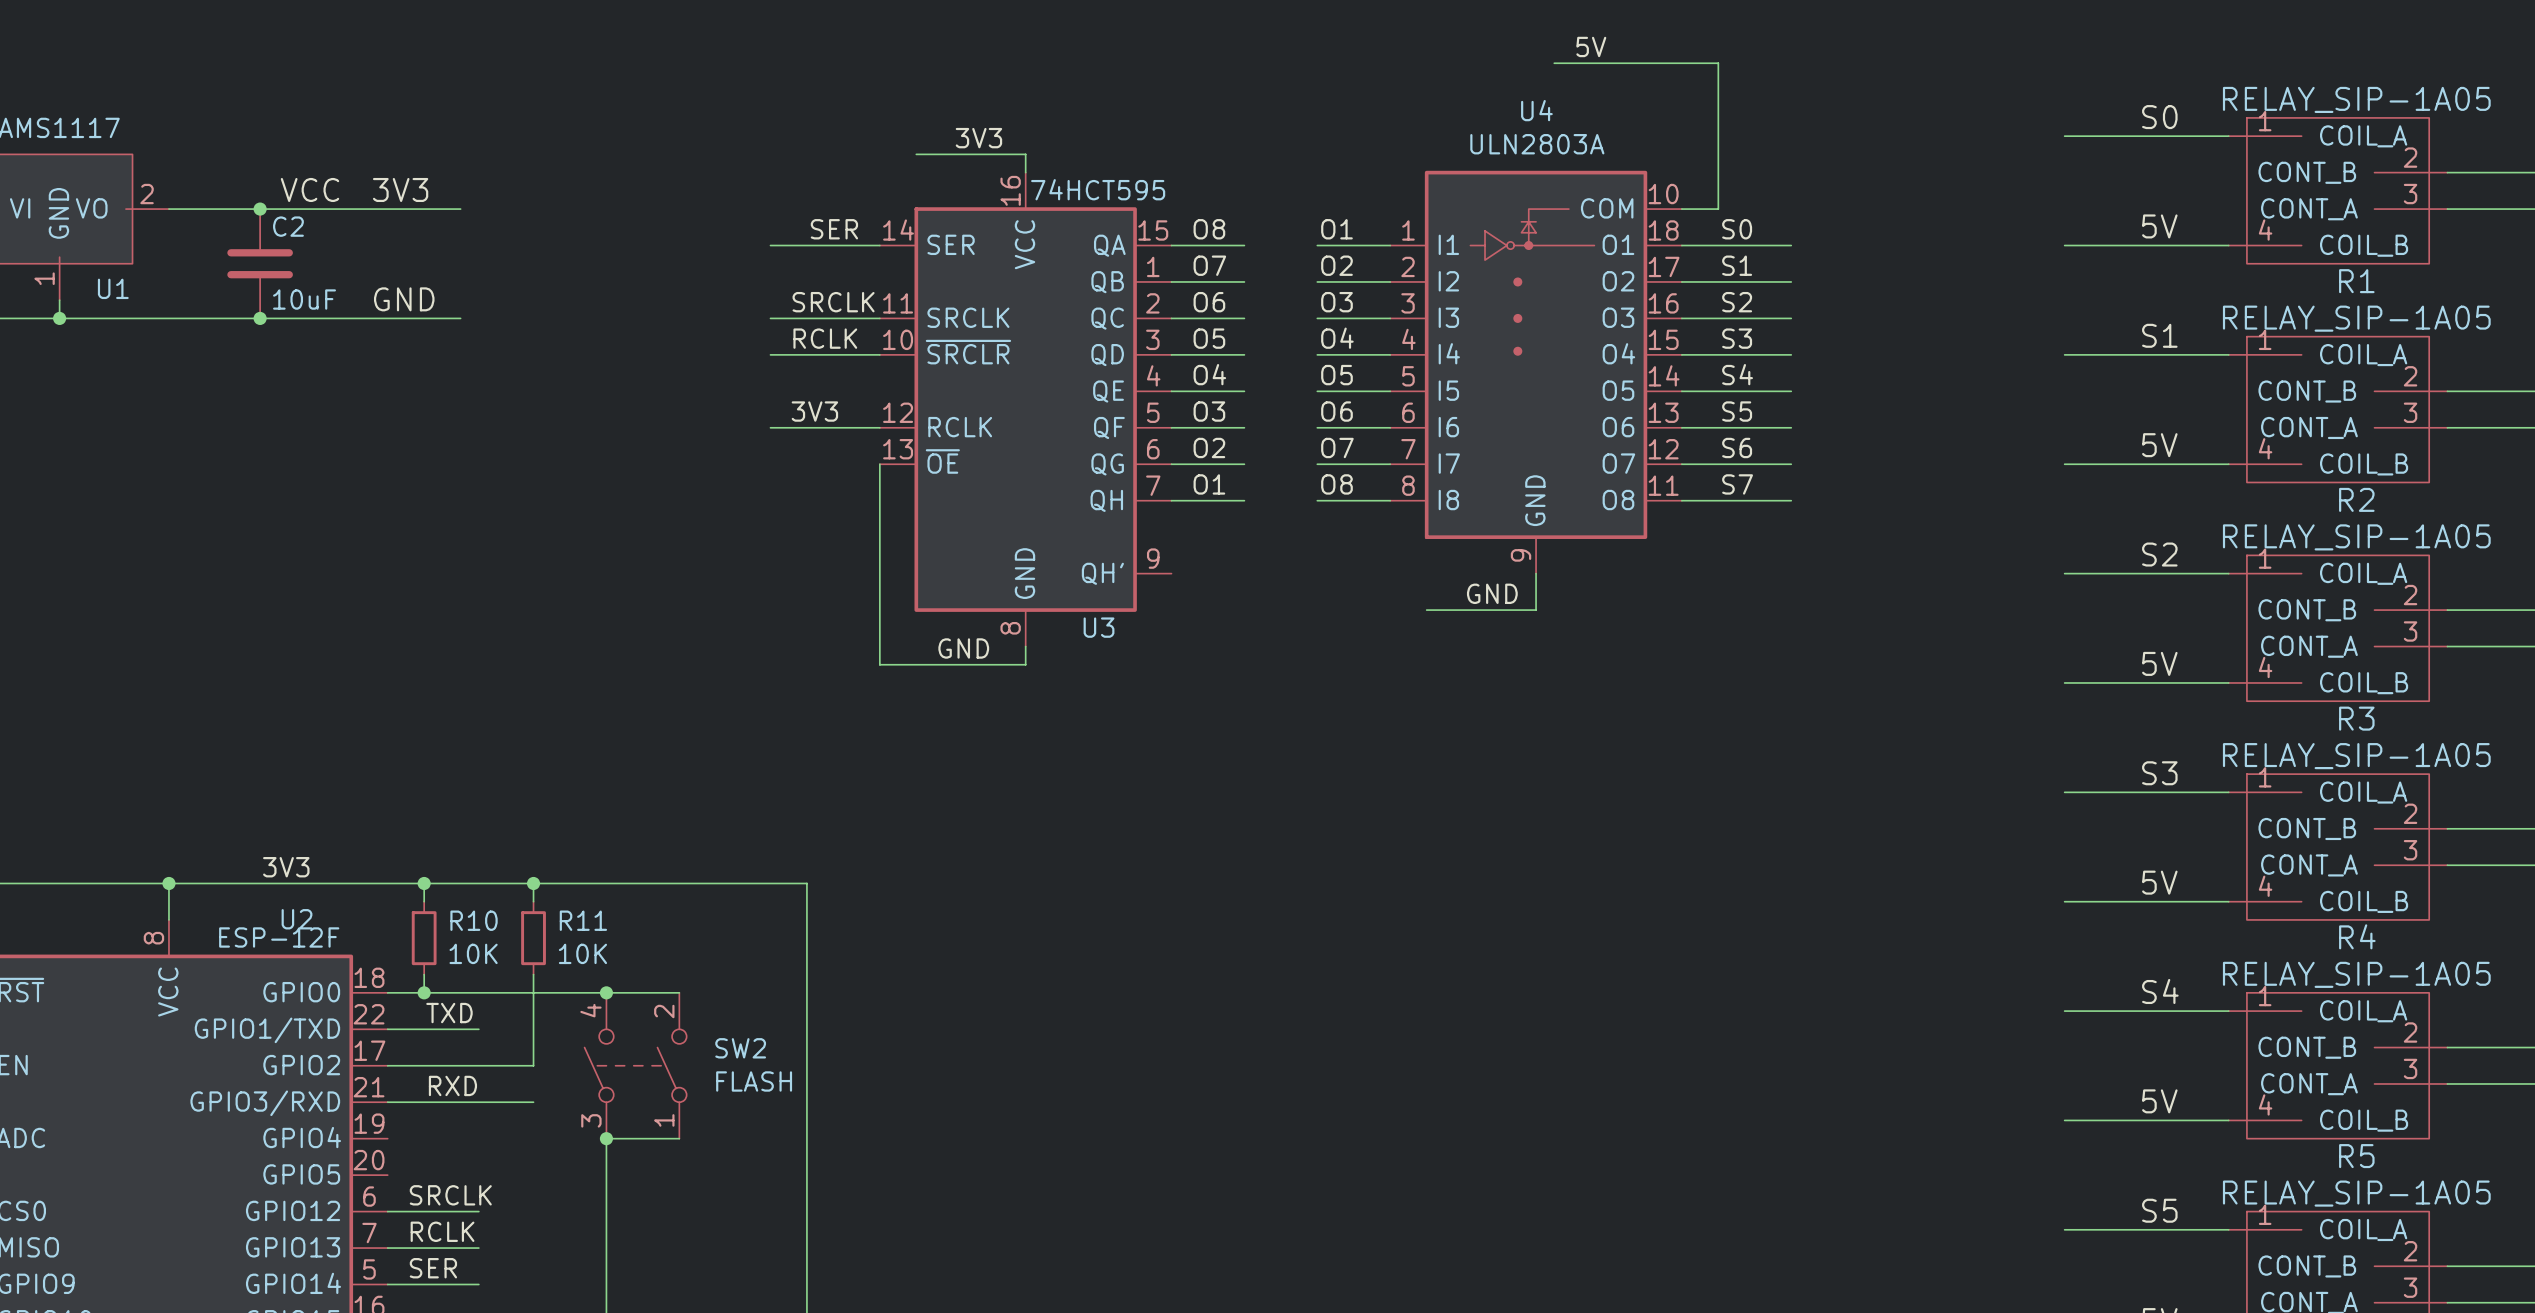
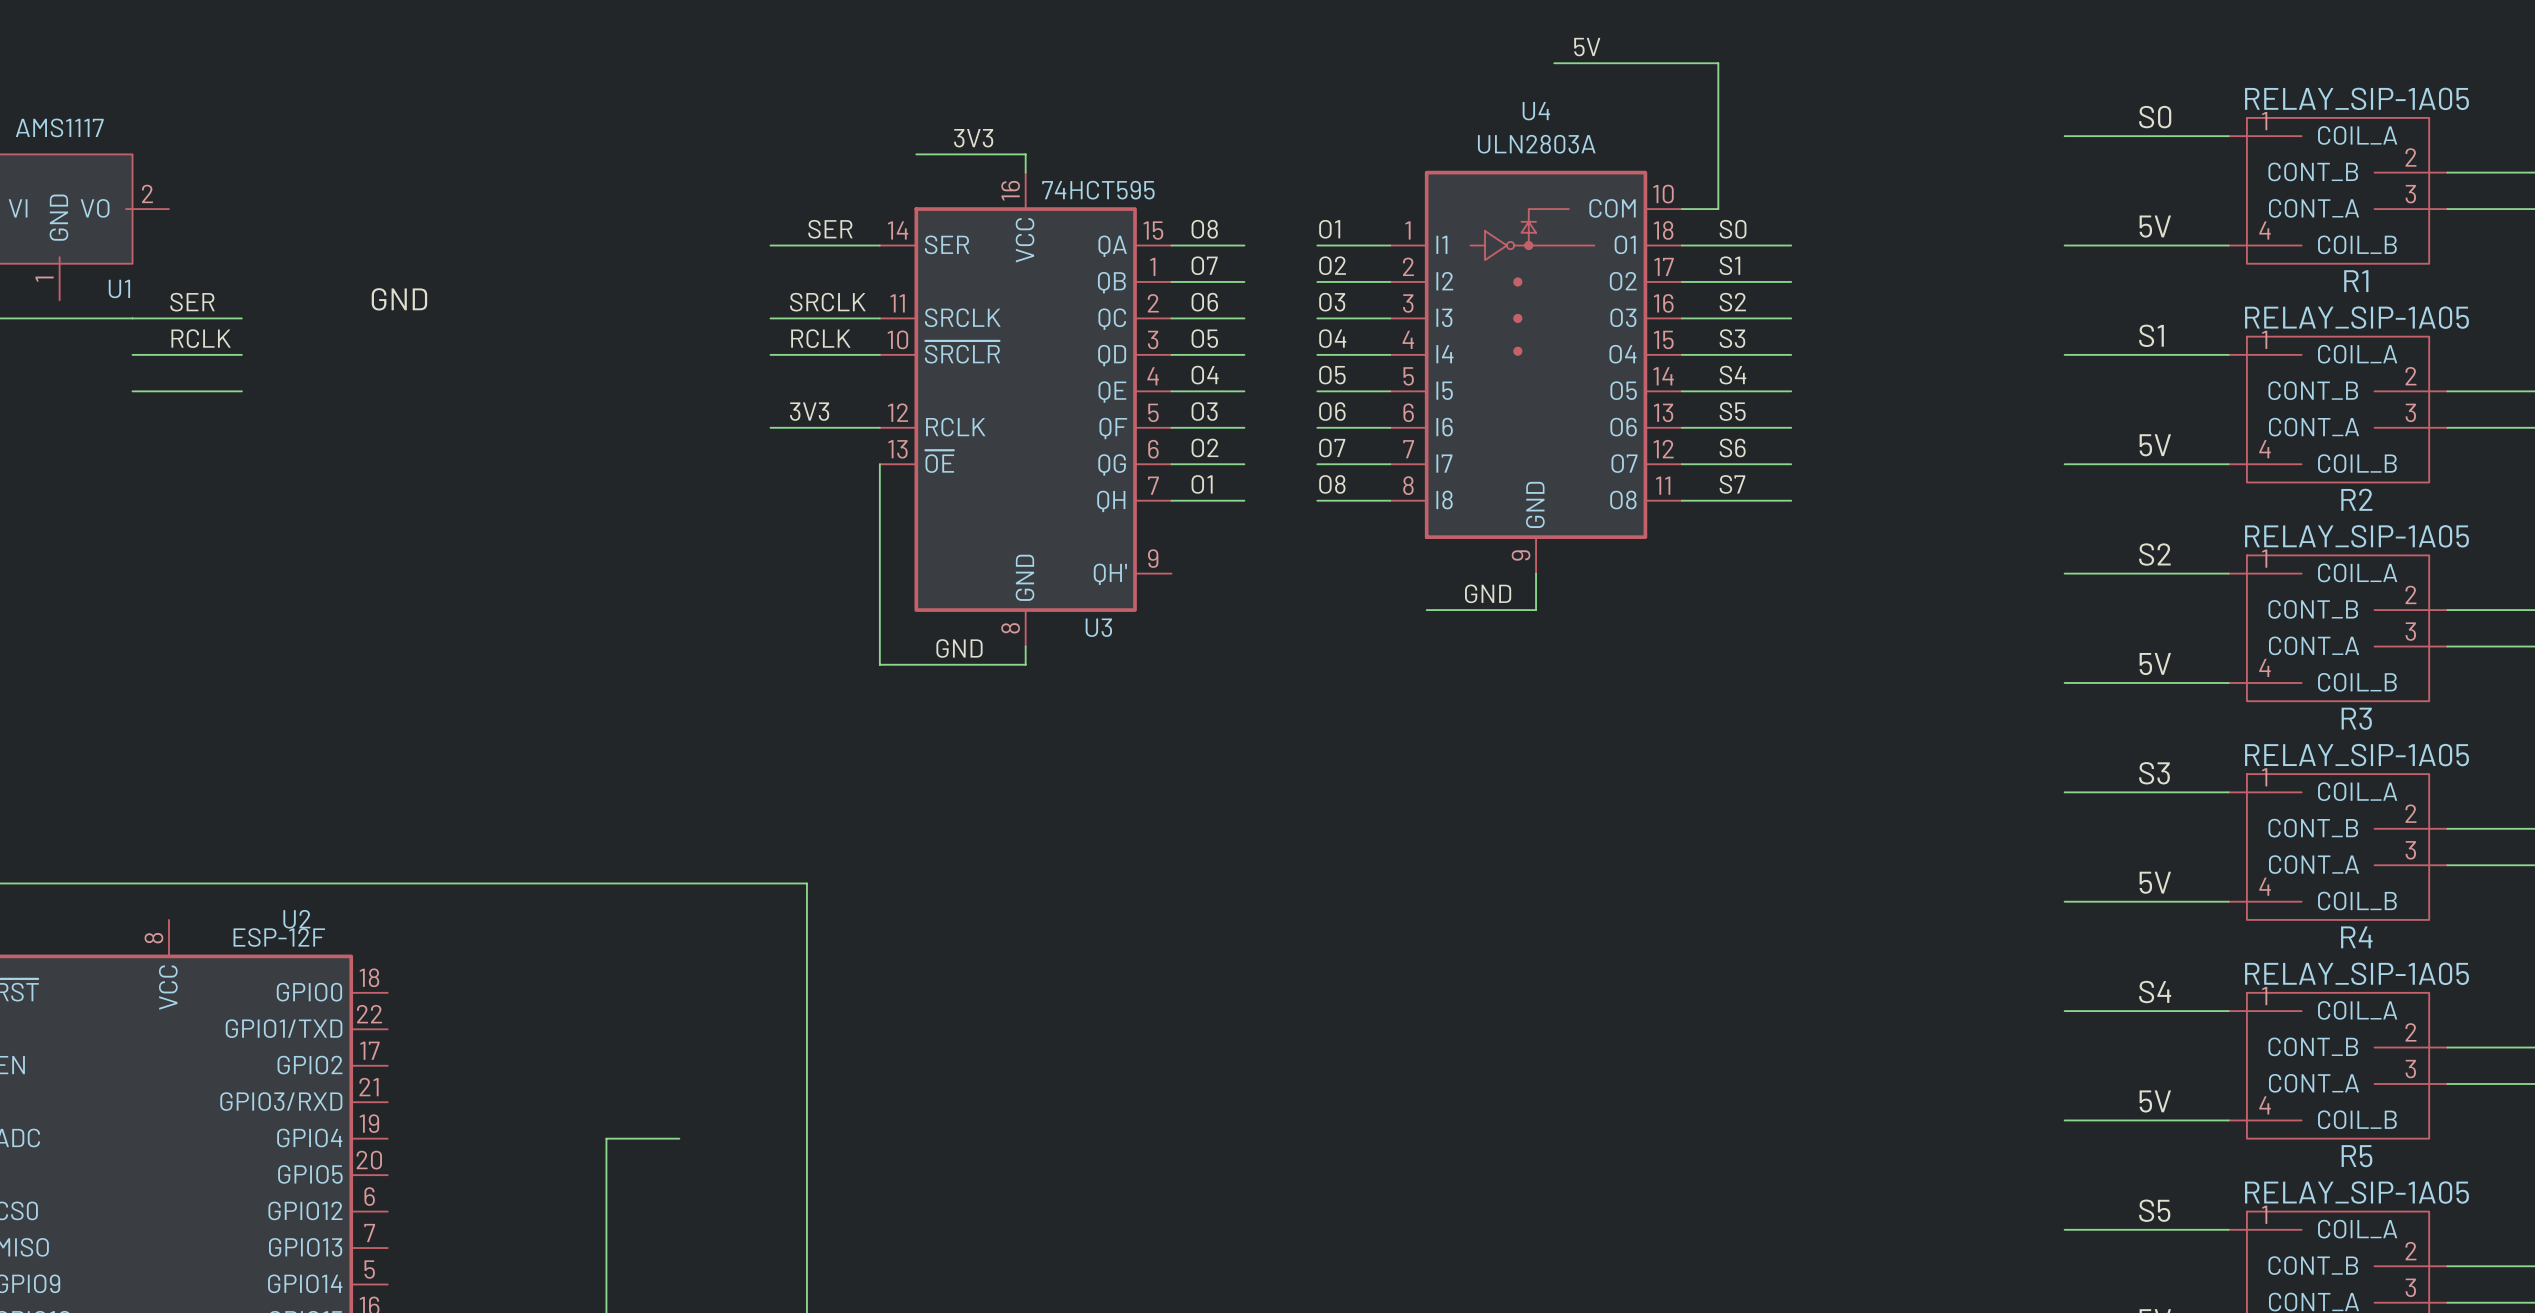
label: VCC (309, 189) -> none
label: 3V3 (400, 189) -> none
wire: (168, 209) (460, 209) -> none
junction: (260, 209) -> none
C2: 10uF (260, 263) -> none
wire: (59, 300) (59, 318) -> none
label: none -> SER (192, 302)
junction: (59, 318) -> none
wire: (241, 318) (460, 318) -> none
junction: (260, 318) -> none
label: none -> RCLK (201, 338)
wire: none -> (132, 354) (241, 354)
wire: none -> (132, 391) (241, 391)
label: 3V3 (286, 867) -> none
wire: (168, 883) (168, 919) -> none
junction: (168, 883) -> none
wire: (424, 883) (424, 901) -> none
junction: (424, 883) -> none
wire: (533, 883) (533, 901) -> none
junction: (533, 883) -> none
R10: 10K (424, 938) -> none
R11: 10K (533, 938) -> none
wire: (424, 974) (424, 992) -> none
wire: (533, 974) (533, 1065) (387, 1065) -> none
wire: (387, 992) (679, 992) -> none
junction: (424, 992) -> none
junction: (606, 992) -> none
label: TXD (449, 1013) -> none
wire: (387, 1029) (478, 1029) -> none
SW2: FLASH (635, 1065) -> none
label: RXD (452, 1085) -> none
wire: (387, 1102) (533, 1102) -> none
junction: (606, 1138) -> none
label: SRCLK (450, 1195) -> none
wire: (387, 1211) (478, 1211) -> none
label: RCLK (442, 1231) -> none
wire: (387, 1248) (478, 1248) -> none
label: SER (433, 1268) -> none
wire: (387, 1284) (478, 1284) -> none

